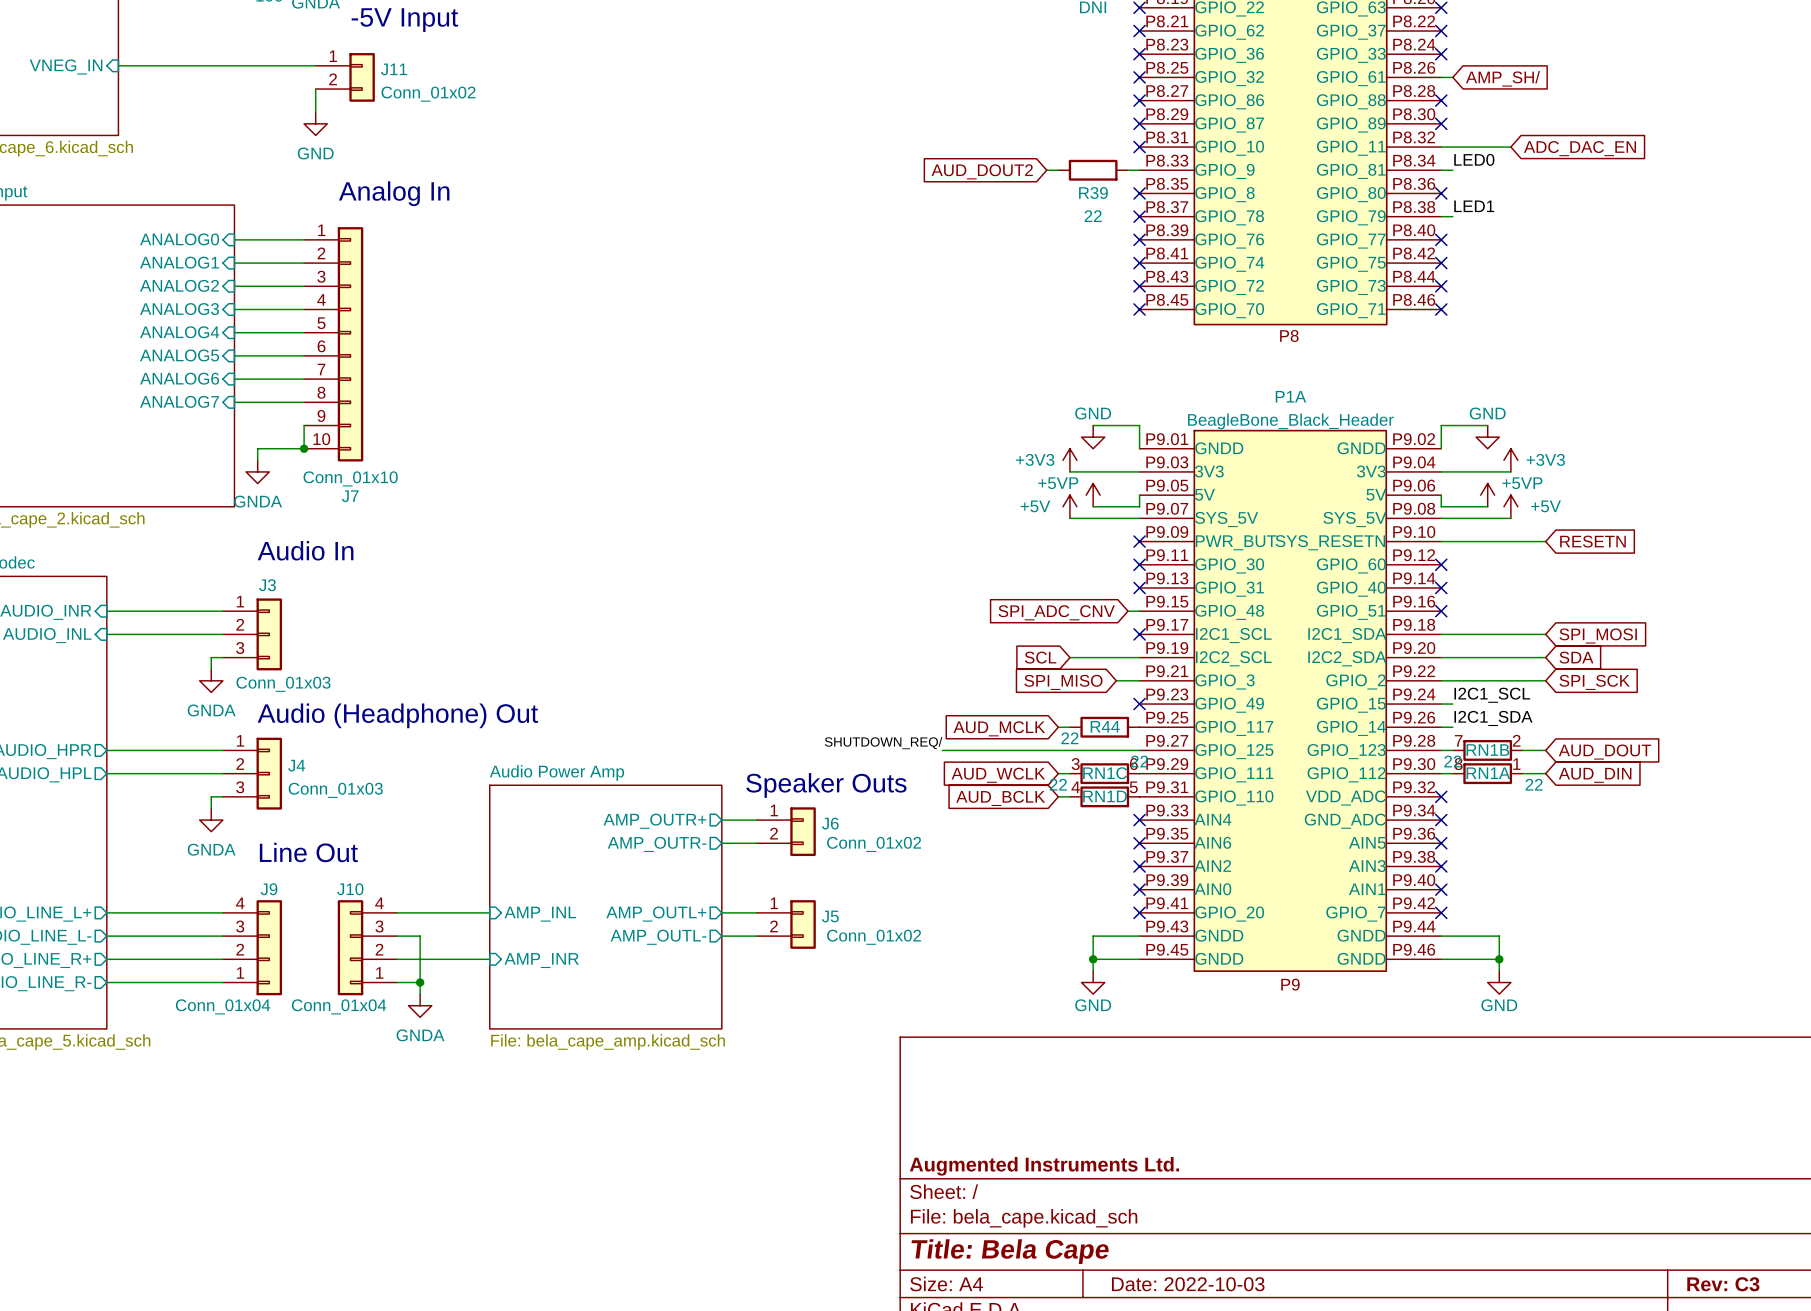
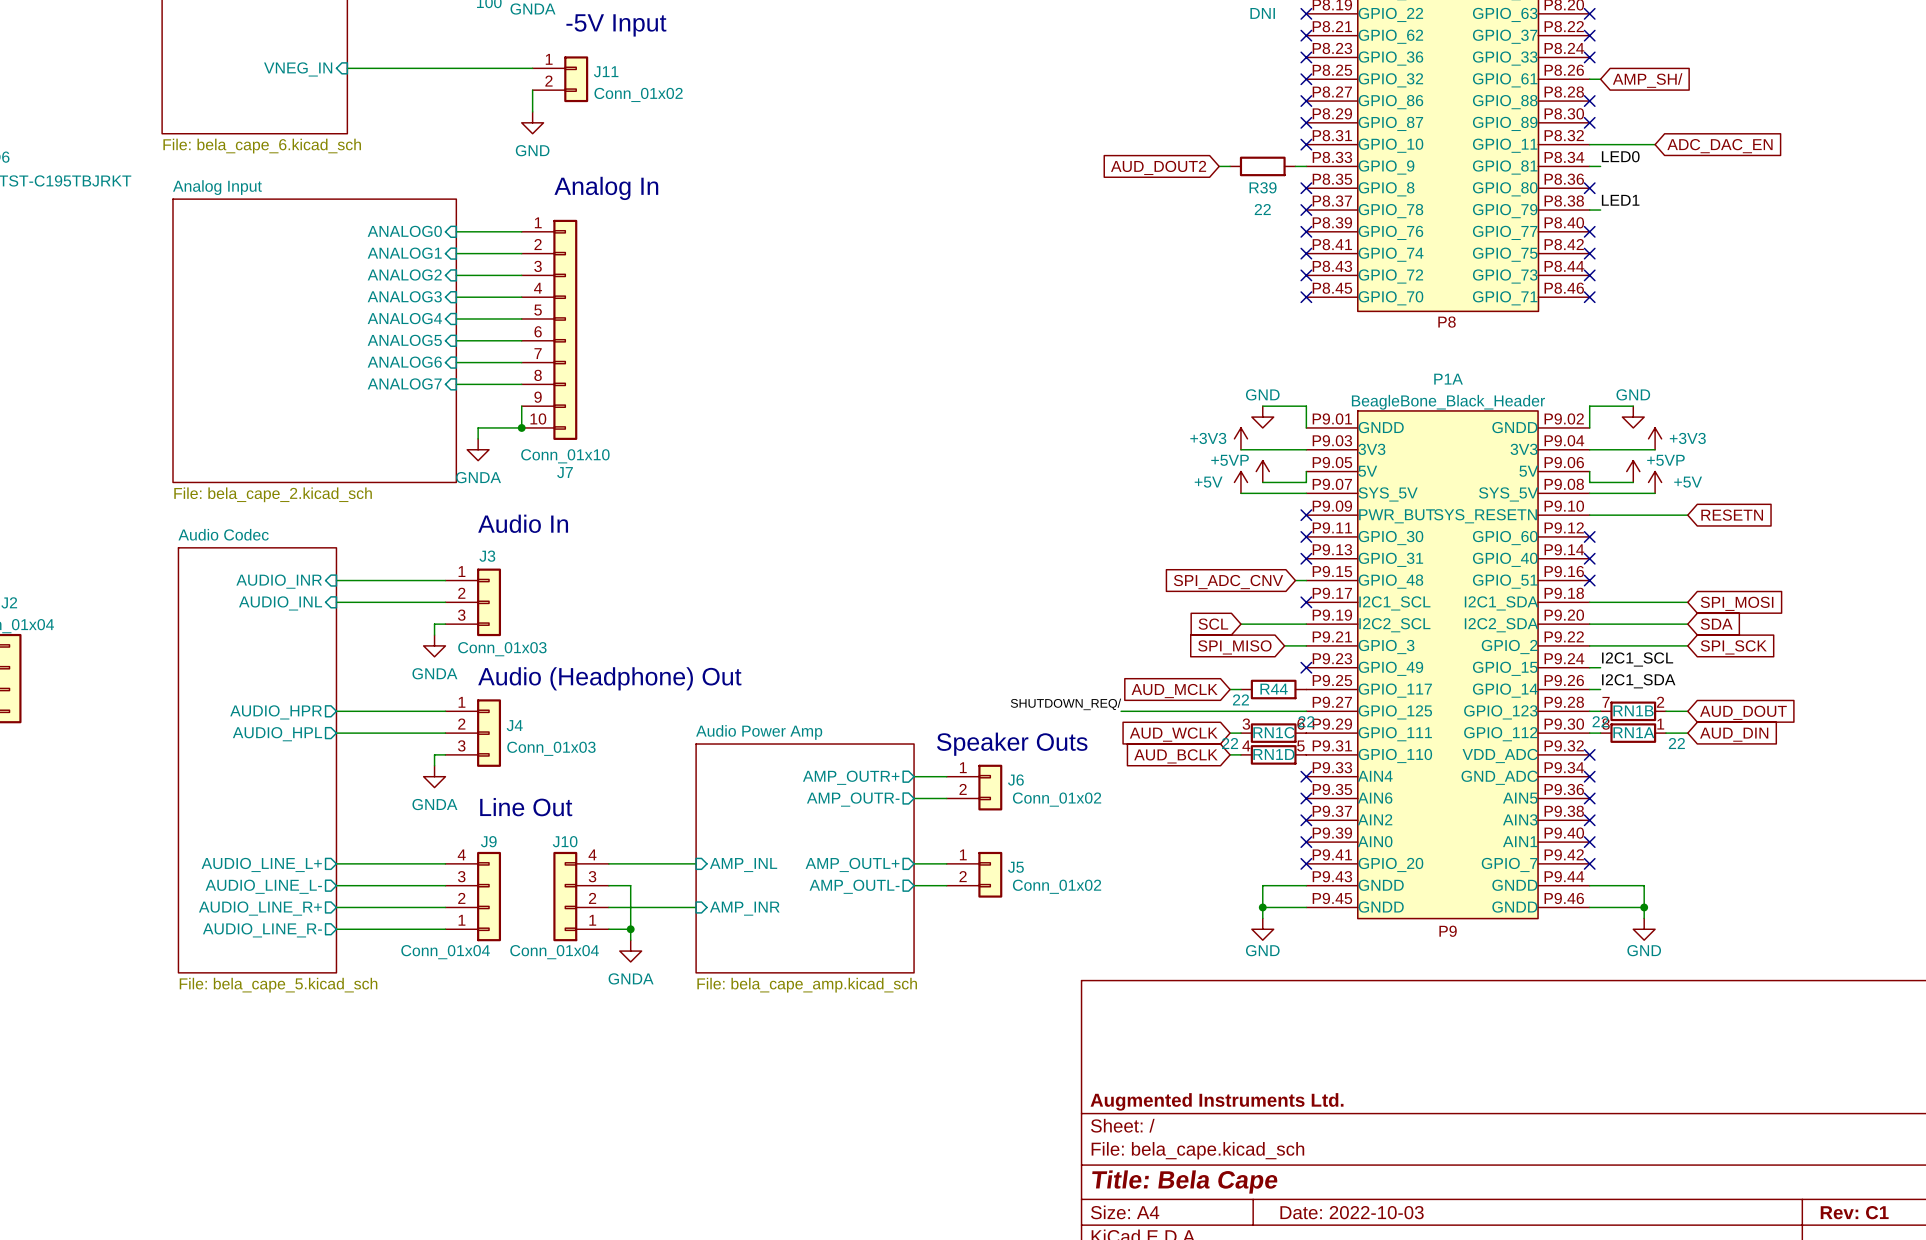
title block: Rev: C3 (1723, 1284) -> Rev: C1 (1854, 1212)

